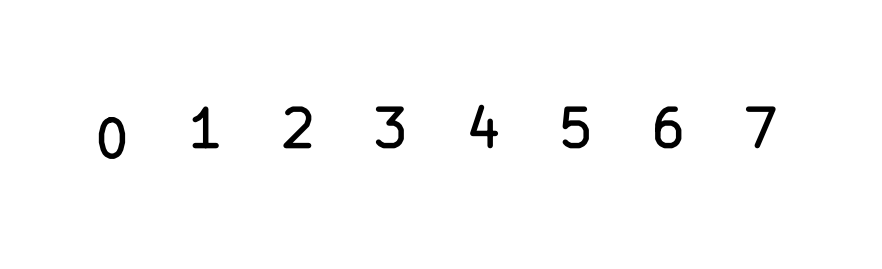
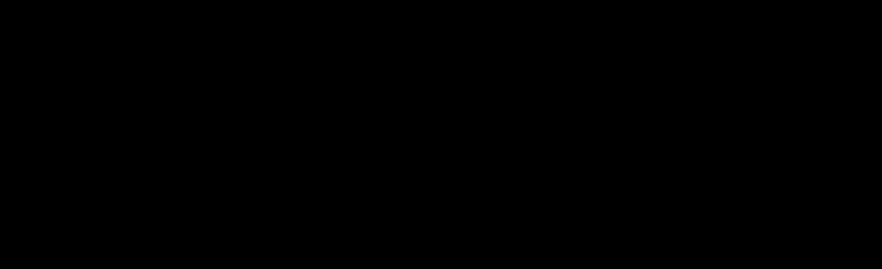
text: 4 (484, 126) -> none
text: 1 (205, 127) -> none
text: 2 (297, 127) -> none
text: 3 (389, 127) -> none
text: 5 (575, 127) -> none
text: 6 (668, 127) -> none
text: 7 (760, 127) -> none
text: 0 (111, 137) -> none

